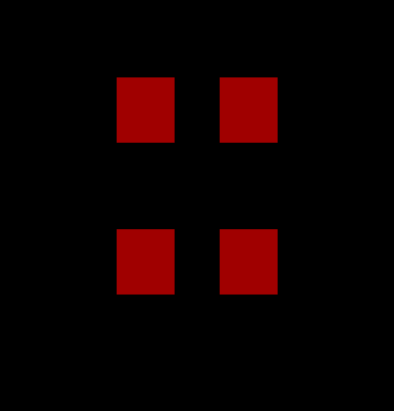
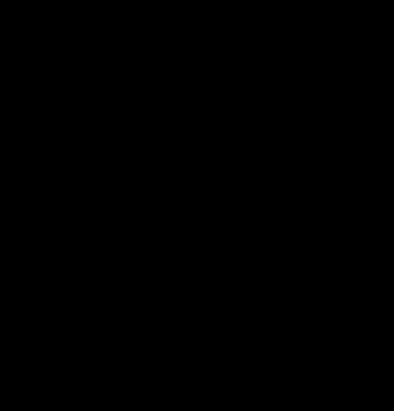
part: (197, 110) -> none
part: (197, 261) -> none

